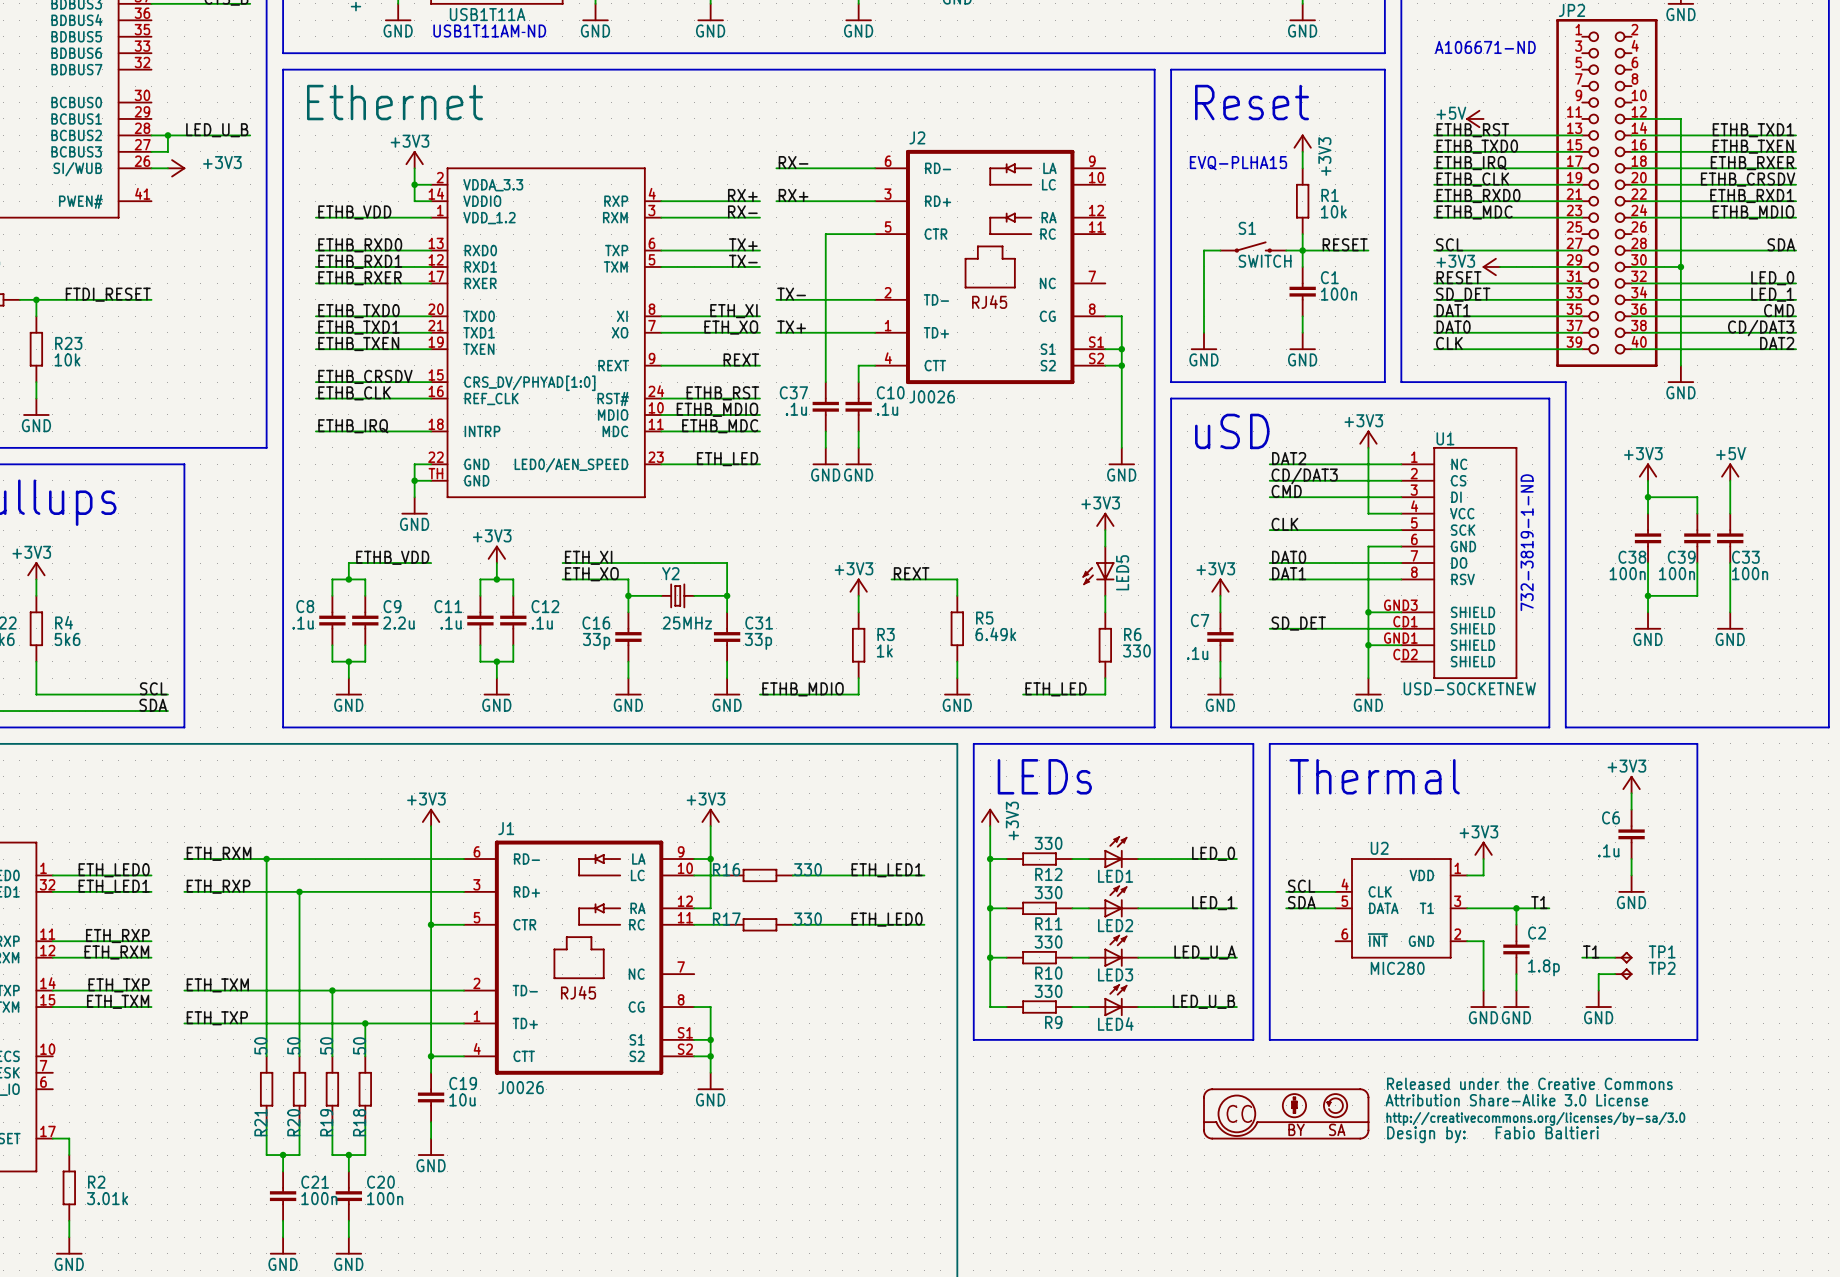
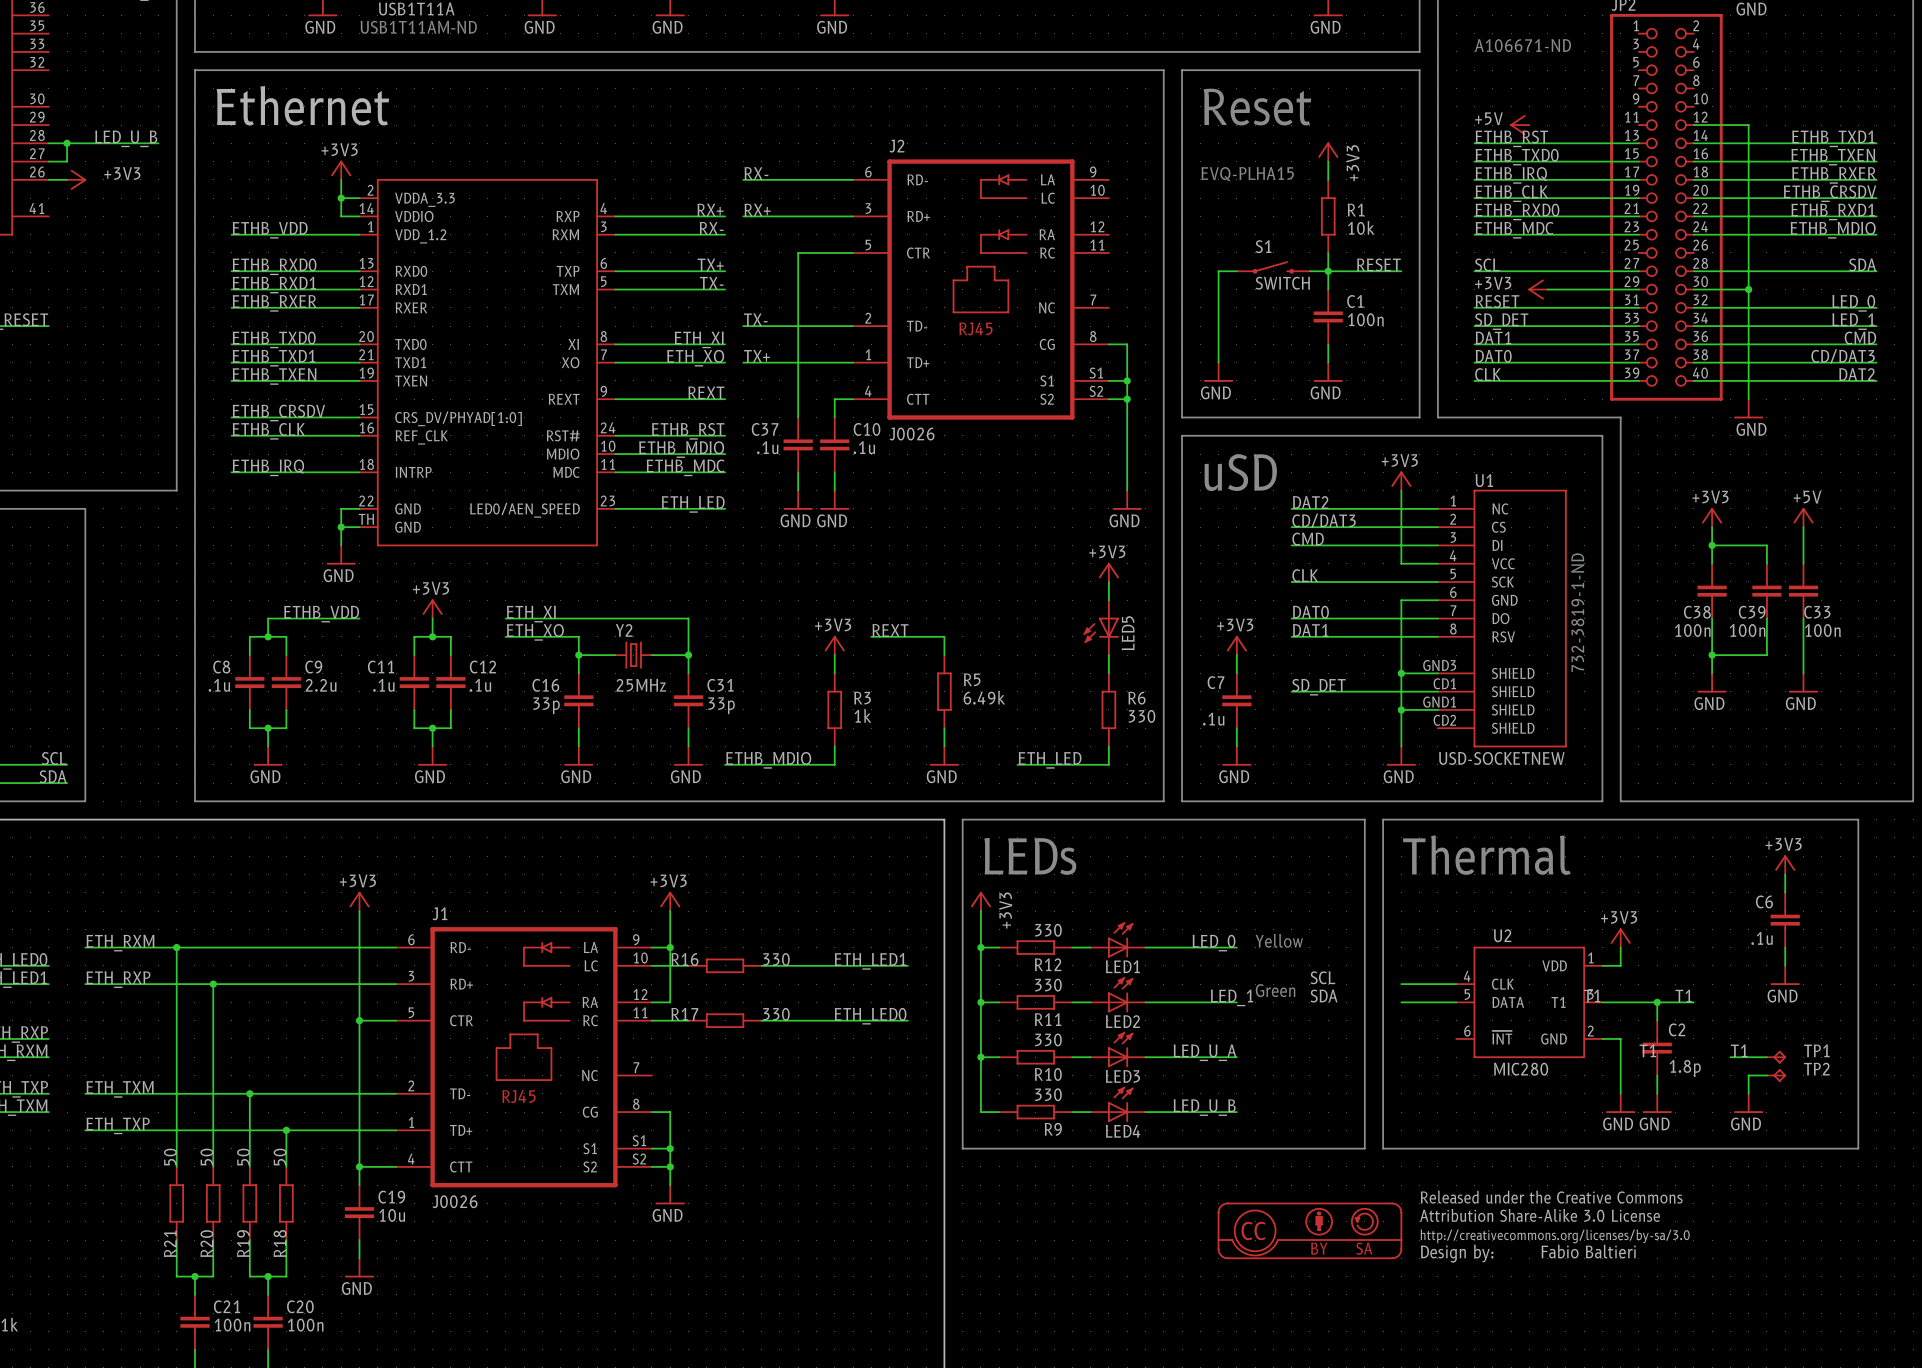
line: (1253, 743) (1253, 1039) -> (1273, 819) (1291, 819)
line: (1269, 743) (1269, 1039) -> (1273, 1148) (1291, 1148)
line: (1335, 743) (1352, 743) -> (1364, 819) (1364, 1148)
line: (1697, 743) (1697, 1039) -> (1766, 819) (1858, 819) (1858, 1148) (1766, 1148)
text position: Thermal (1374, 776) -> Thermal (1486, 855)
power symbol: +3V3 (1631, 784) -> none
power symbol: none -> +3V3 (1785, 864)
wire: (1631, 793) (1631, 809) -> (1785, 874) (1785, 892)
C6 position: (1631, 834) -> (1785, 920)
power symbol: +3V3 (1483, 850) -> none
power symbol: none -> +3V3 (1620, 937)
label position: LED_0 (1213, 853) -> LED_0 (1214, 943)
text: none -> Yellow (1279, 940)
wire: (1220, 859) (1236, 859) -> none
wire: (1483, 859) (1483, 875) (1467, 875) -> (1620, 947) (1620, 965) (1602, 965)
wire: (1631, 859) (1631, 875) -> (1785, 947) (1785, 965)
power symbol: GND (1631, 884) -> none
power symbol: none -> GND (1785, 975)
wire: (1286, 891) (1335, 891) -> (1401, 984) (1456, 984)
text: none -> Green (1275, 990)
label: none -> T1 (1683, 996)
wire: (1220, 908) (1236, 908) -> none
wire: (1286, 908) (1335, 908) -> (1401, 1002) (1456, 1002)
U2 position: (1401, 908) -> (1529, 1002)
wire: (1467, 908) (1549, 908) -> (1693, 1002) (1602, 1002)
wire: (1516, 908) (1516, 924) -> (1657, 1002) (1657, 1020)
junction: (1516, 908) -> none
junction: none -> (1657, 1002)
wire: (1467, 941) (1483, 941) (1483, 990) -> (1602, 1038) (1620, 1038) (1620, 1093)
C2 position: (1516, 949) -> (1657, 1048)
label: none -> T1 (1739, 1050)
label position: LED_U_A (1205, 952) -> LED_U_A (1205, 1052)
wire: (1220, 957) (1236, 957) -> none
wire: (1582, 957) (1615, 957) -> (1730, 1057) (1766, 1057)
TP1 position: (1623, 957) -> (1776, 1057)
wire: (1516, 974) (1516, 990) -> none
wire: (1598, 974) (1615, 974) -> none
TP2 position: (1623, 974) -> (1776, 1075)
wire: none -> (1766, 1075) (1748, 1075) (1748, 1093)
power symbol: GND (1483, 999) -> none
power symbol: GND (1516, 999) -> none
power symbol: none -> GND (1620, 1103)
power symbol: none -> GND (1748, 1103)
label position: LED_U_B (1203, 1001) -> LED_U_B (1204, 1107)
wire: (1220, 1007) (1236, 1007) -> none
line: (1335, 1039) (1352, 1039) -> (1383, 819) (1383, 1148)

